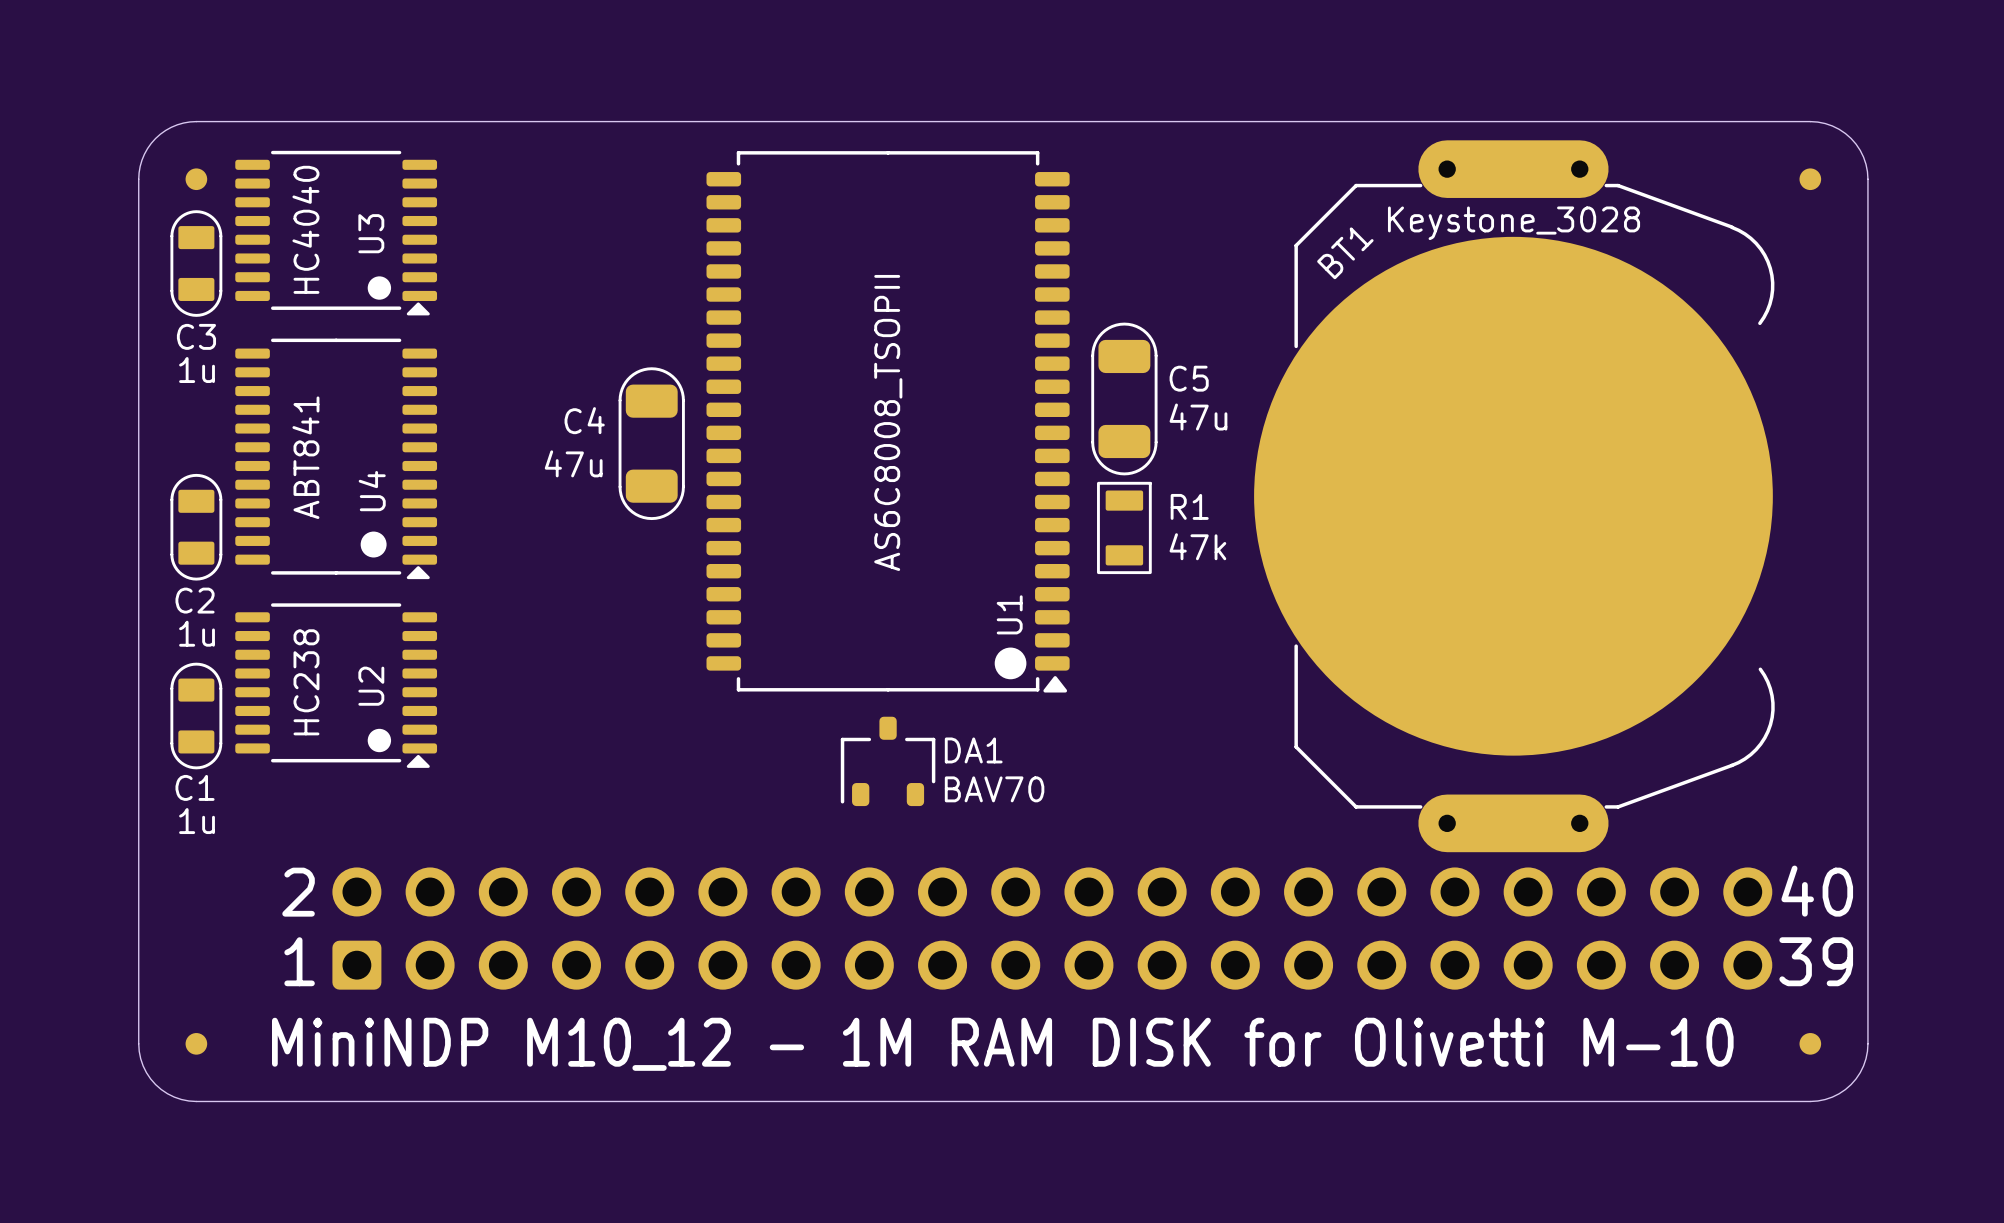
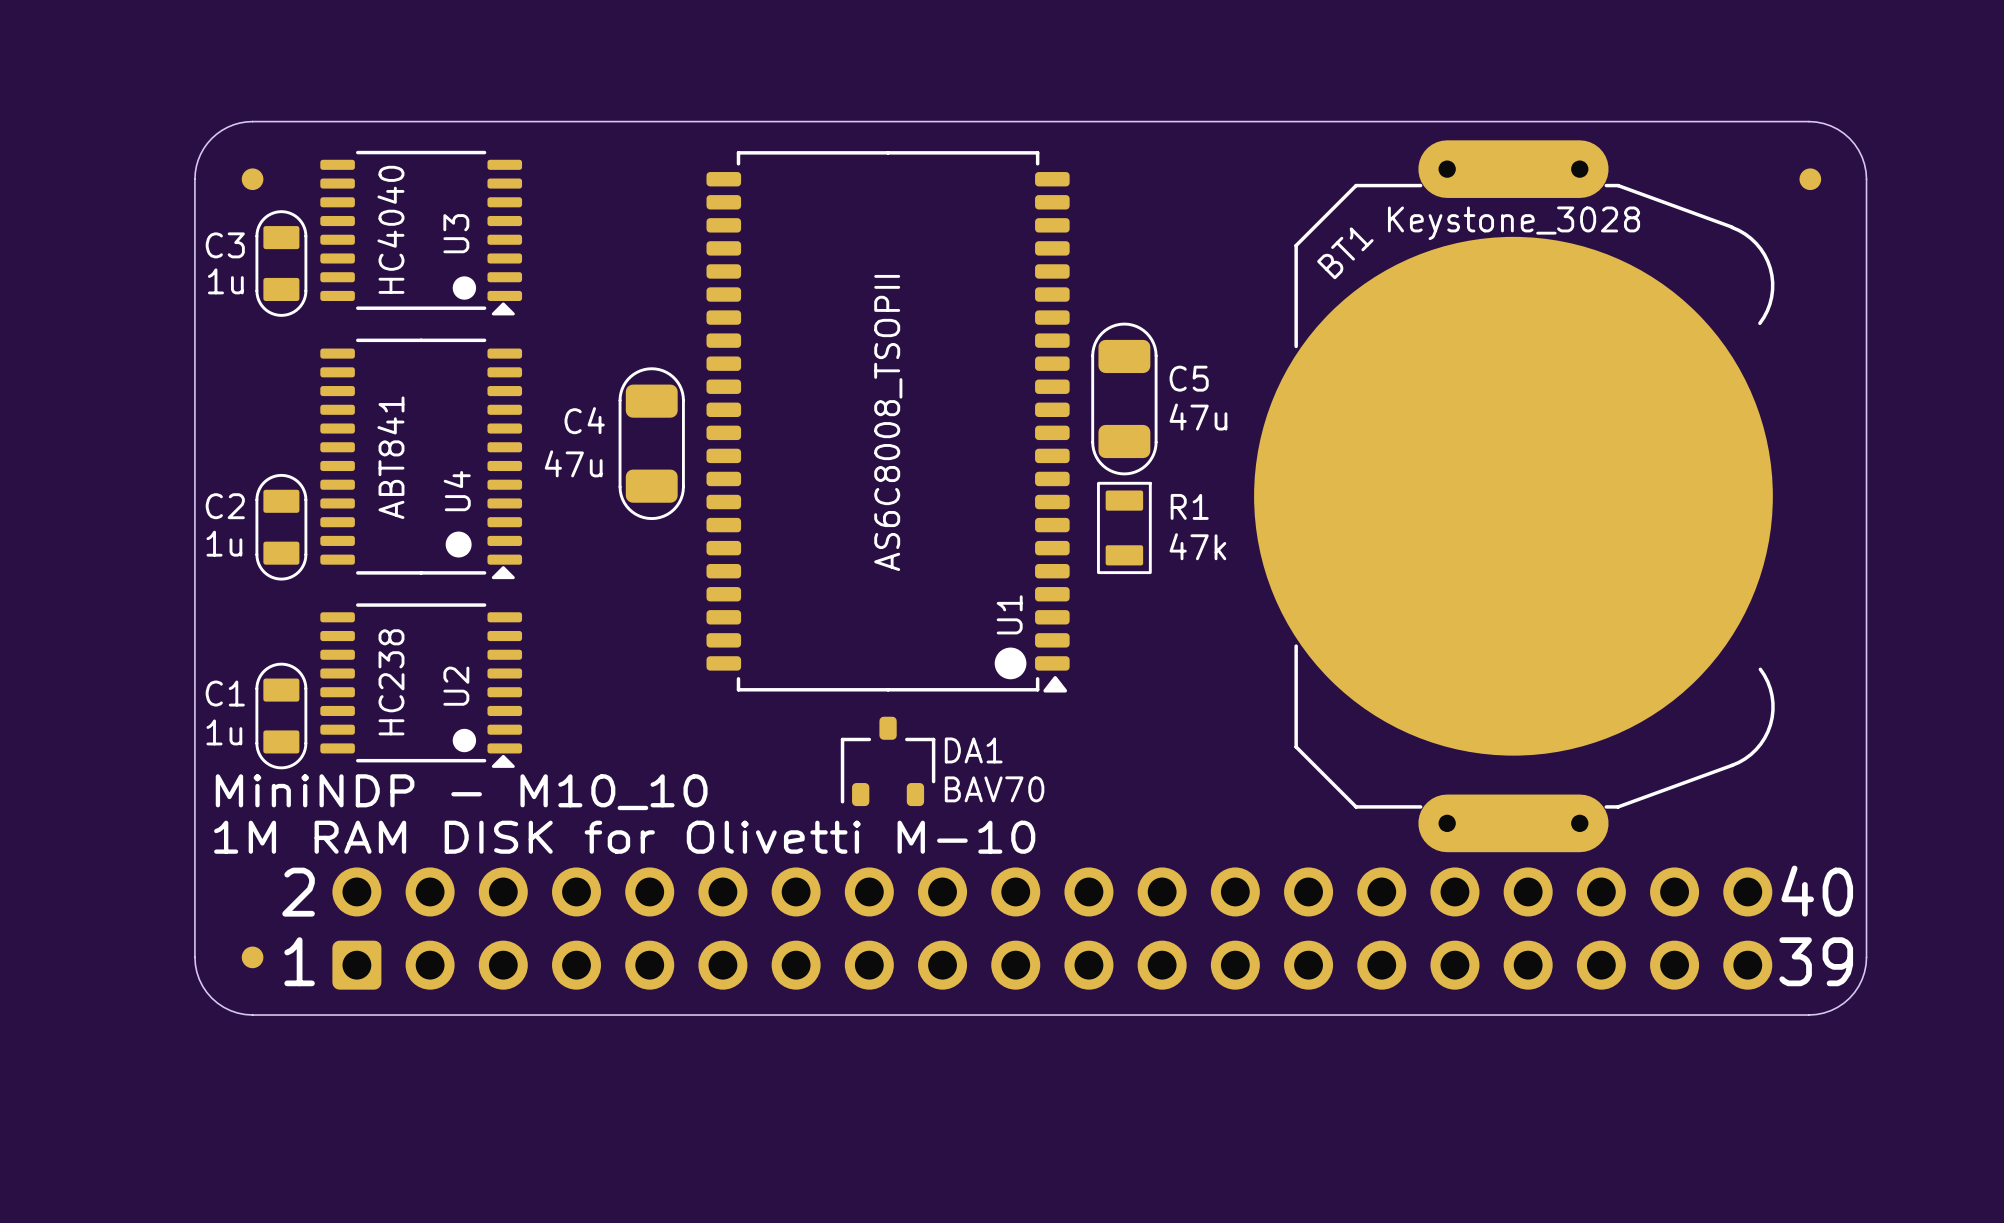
board edge: (252, 121) (189, 121) (171, 127) (160, 134) (147, 148) (139, 172) (138, 1043) (143, 1065) (155, 1084) (174, 1097) (196, 1101) (1810, 1101) (1825, 1099) (1839, 1093) (1851, 1084) (1860, 1072) (1865, 1058) (1867, 1043) (1867, 179) (1863, 157) (1851, 138) (1832, 125) (1808, 121) -> (252, 121) (227, 127) (211, 138) (200, 154) (194, 179) (195, 964) (202, 986) (217, 1003) (237, 1013) (252, 1015) (1808, 1015) (1823, 1013) (1837, 1007) (1849, 998) (1858, 986) (1864, 972) (1866, 957) (1866, 179) (1862, 157) (1849, 138) (1830, 125) (1808, 121)
part position: (196, 179) -> (252, 179)
U3 position: (336, 233) -> (421, 233)
C3 position: (196, 263) -> (281, 263)
C3 name position: C3 (196, 336) -> C3 (225, 245)
C3 value position: 1u (197, 370) -> 1u (225, 281)
U4 position: (336, 458) -> (421, 458)
C2 position: (196, 527) -> (281, 527)
C2 name position: C2 (195, 600) -> C2 (225, 506)
C2 value position: 1u (197, 633) -> 1u (224, 543)
U2 position: (336, 685) -> (421, 685)
C1 position: (196, 716) -> (281, 716)
C1 name position: C1 (195, 787) -> C1 (225, 693)
text: none -> MiniNDP - M10_10 (461, 792)
C1 value position: 1u (197, 821) -> 1u (224, 732)
text: none -> 1M RAM DISK for Olivetti M-10 (624, 837)
part position: (196, 1043) -> (252, 957)
part: (1810, 1043) -> none
text: MiniNDP M10_12 - 1M RAM DISK for Olivetti M-10 (1002, 1044) -> none

